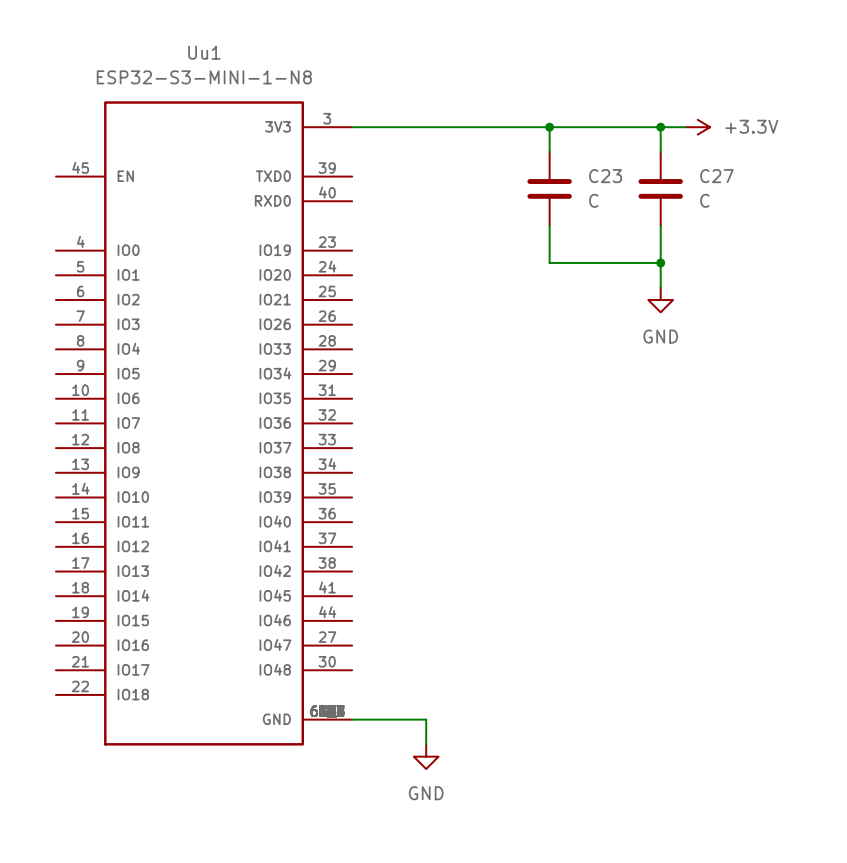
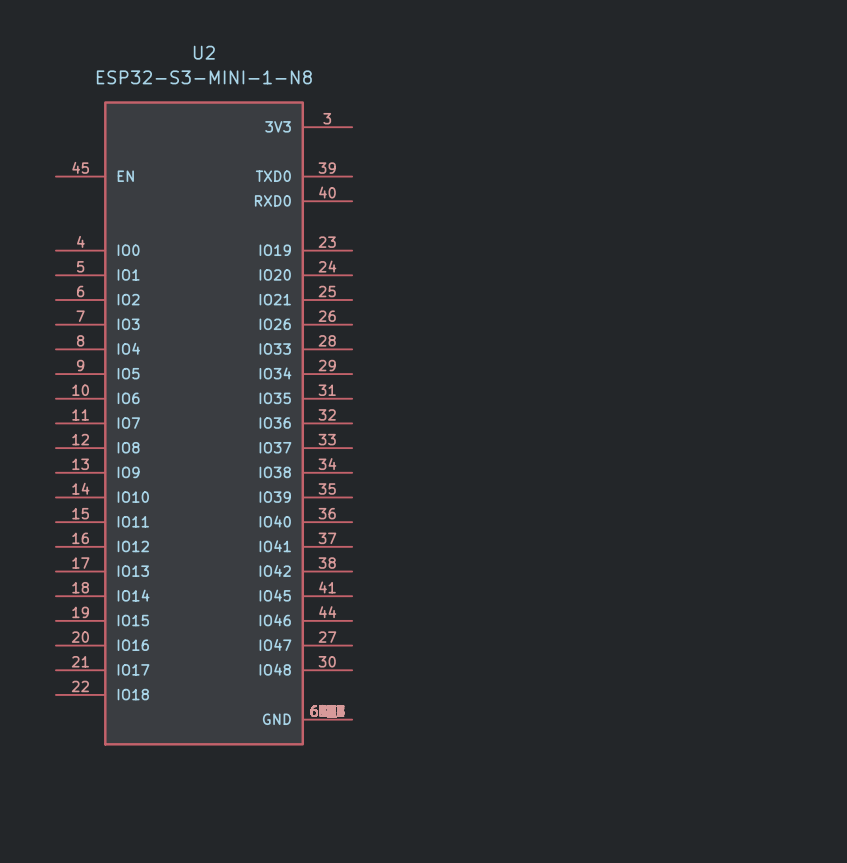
Uu1 name: Uu1 (204, 52) -> U2 (204, 52)
wire: (352, 127) (685, 127) -> none
wire: (549, 127) (549, 151) -> none
junction: (549, 127) -> none
wire: (660, 127) (660, 151) -> none
junction: (660, 127) -> none
power symbol: +3.3V (697, 127) -> none
C23: C (549, 188) -> none
C27: C (660, 188) -> none
wire: (549, 225) (549, 262) (660, 262) -> none
wire: (660, 225) (660, 287) -> none
junction: (660, 262) -> none
power symbol: GND (660, 300) -> none
wire: (352, 719) (426, 719) (426, 744) -> none
power symbol: GND (426, 756) -> none

